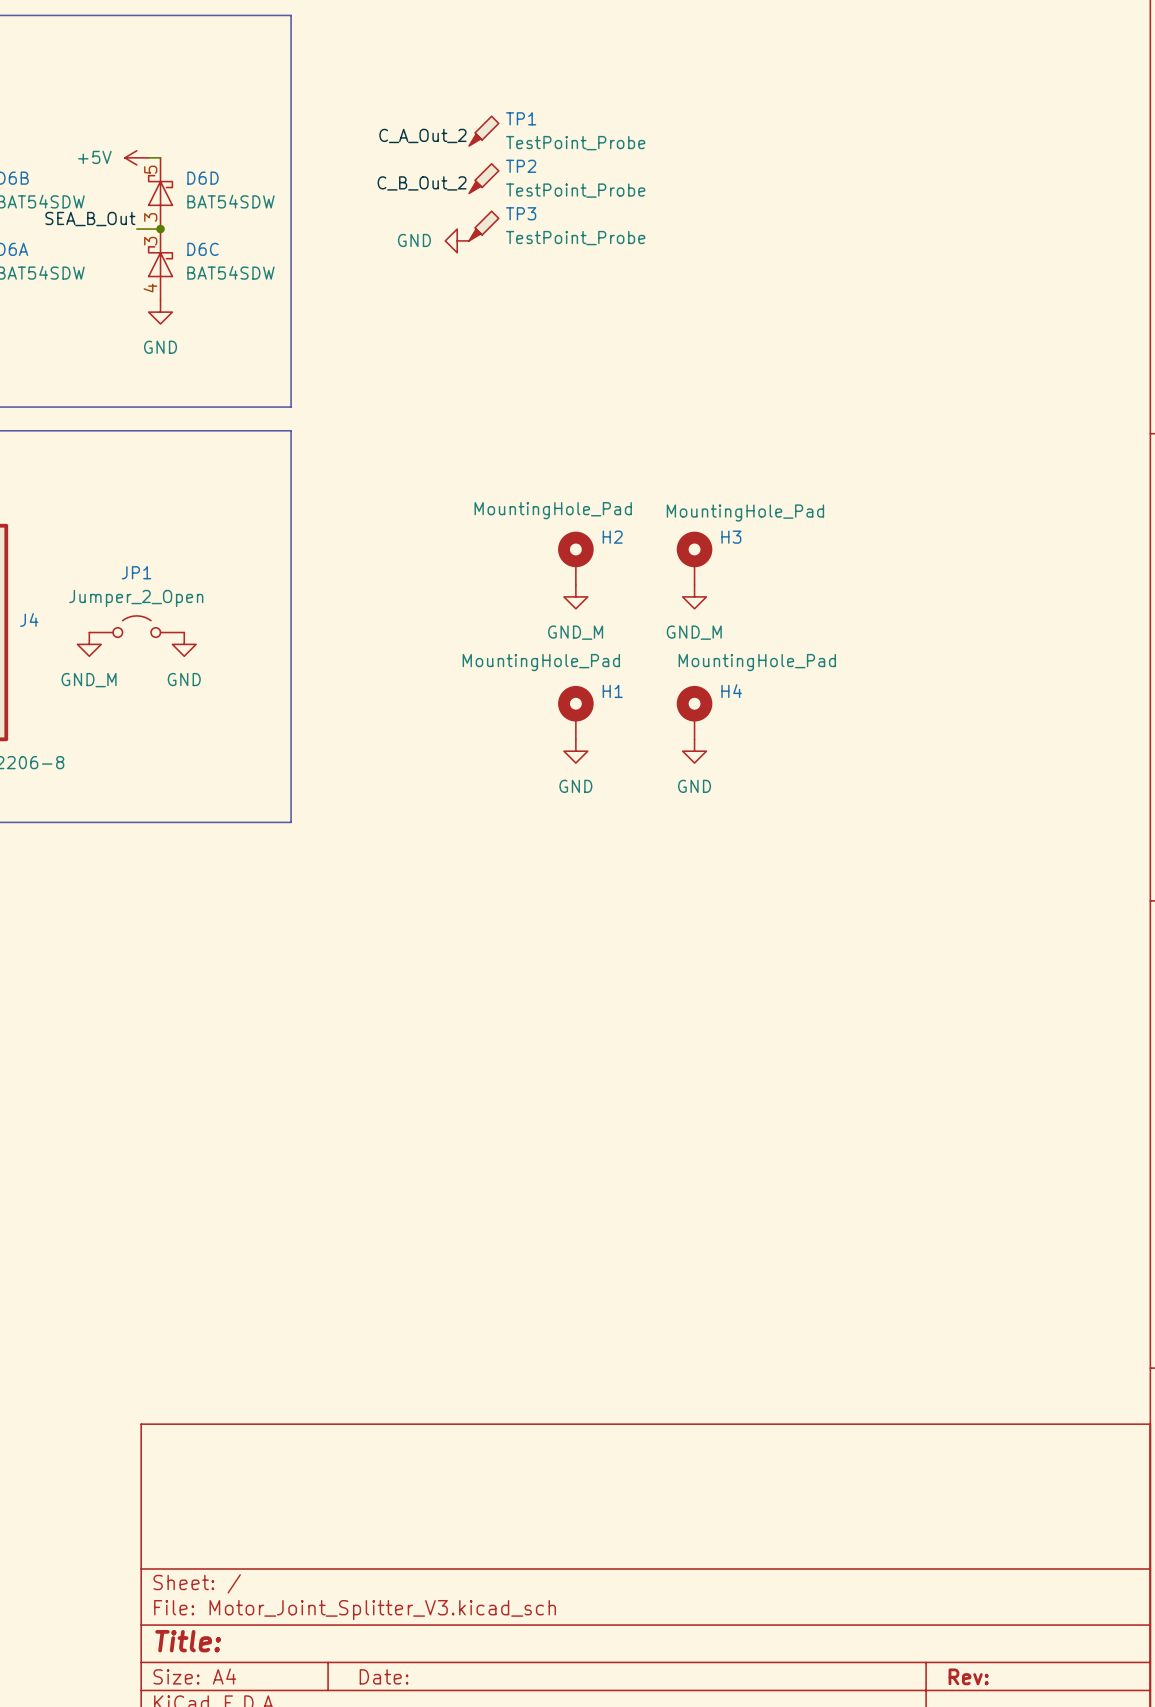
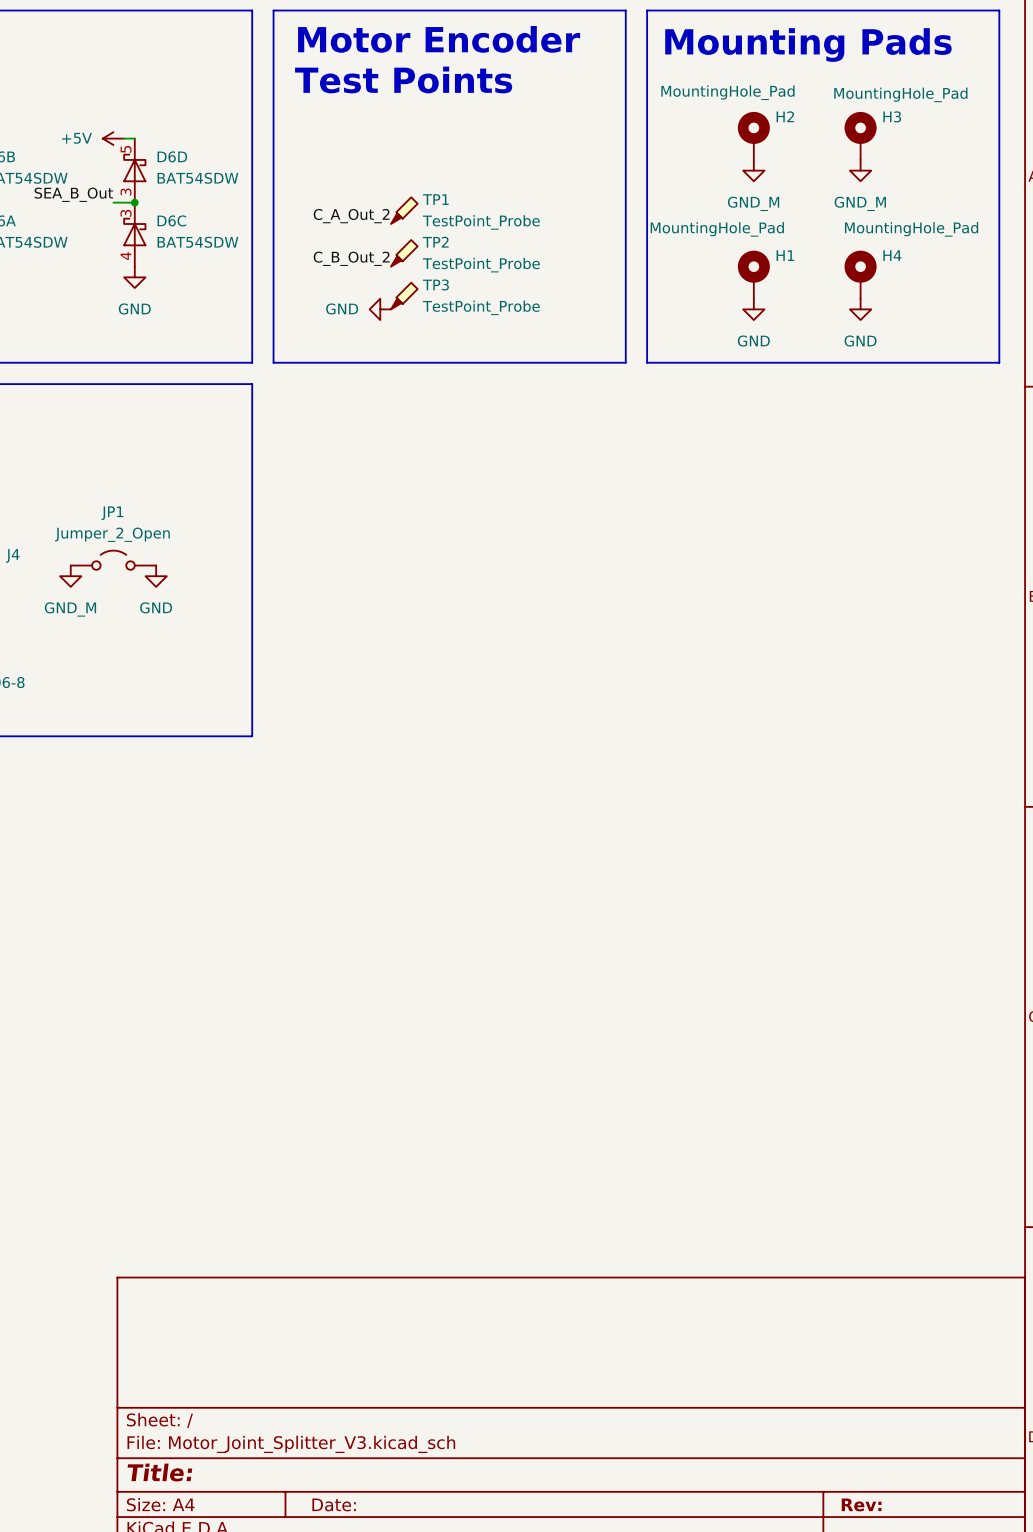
line: none -> (273, 10) (625, 10) (625, 362) (273, 362) (273, 10)
line: none -> (647, 10) (999, 10) (999, 362) (647, 362) (647, 10)
text: none -> Motor Encoder (439, 39)
text: none -> Mounting Pads (808, 45)
text: none -> Test Points (403, 79)
TP1 position: (483, 131) -> (404, 210)
label position: C_A_Out_2 (422, 135) -> C_A_Out_2 (351, 216)
TP2 position: (483, 178) -> (404, 253)
label position: C_B_Out_2 (422, 183) -> C_B_Out_2 (351, 258)
power symbol: none -> GND_M (753, 170)
power symbol: none -> GND_M (860, 170)
TP3 position: (483, 226) -> (404, 296)
power symbol position: GND (457, 240) -> GND (380, 309)
power symbol: none -> GND (753, 309)
power symbol: none -> GND (860, 309)
H2 position: (575, 558) -> (753, 135)
H3 position: (694, 558) -> (860, 135)
power symbol: GND_M (575, 596) -> none
power symbol: GND_M (694, 596) -> none
H1 position: (575, 712) -> (753, 274)
H4 position: (694, 712) -> (860, 274)
power symbol: GND (575, 751) -> none
power symbol: GND (694, 751) -> none

